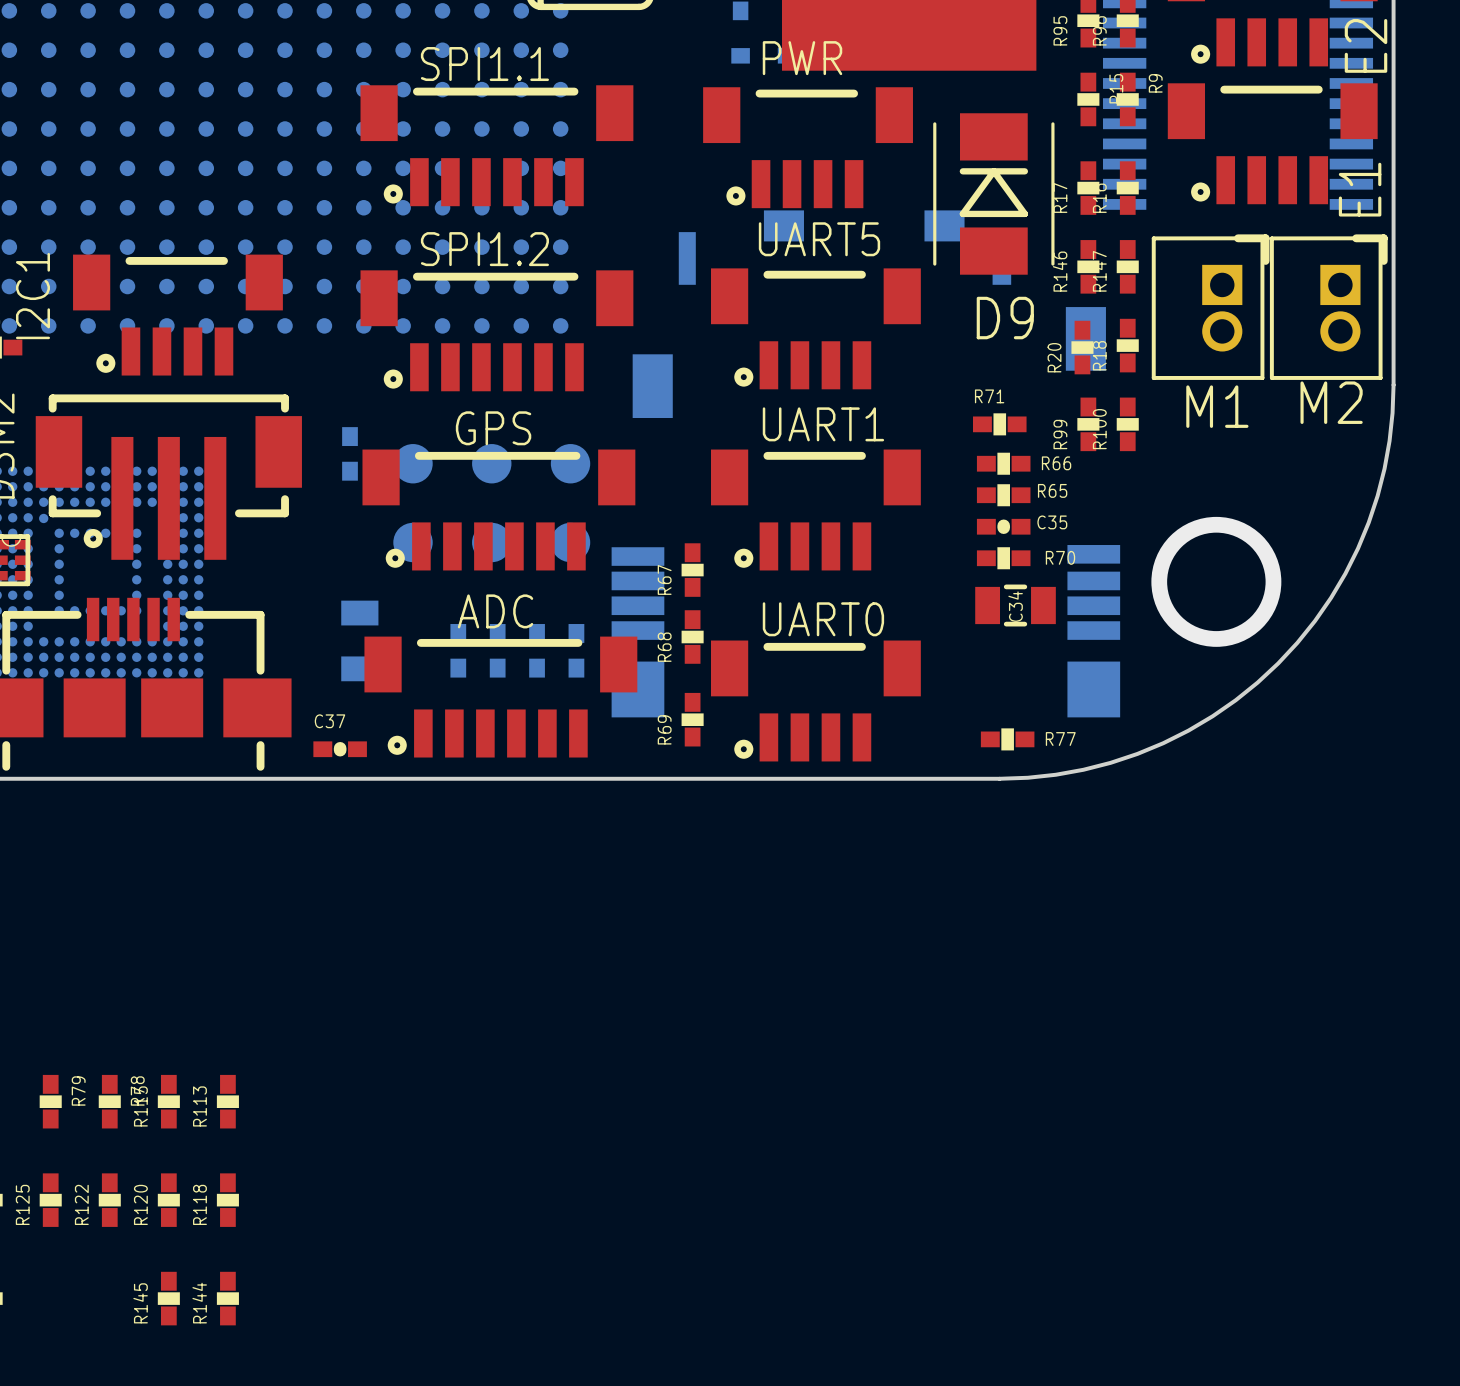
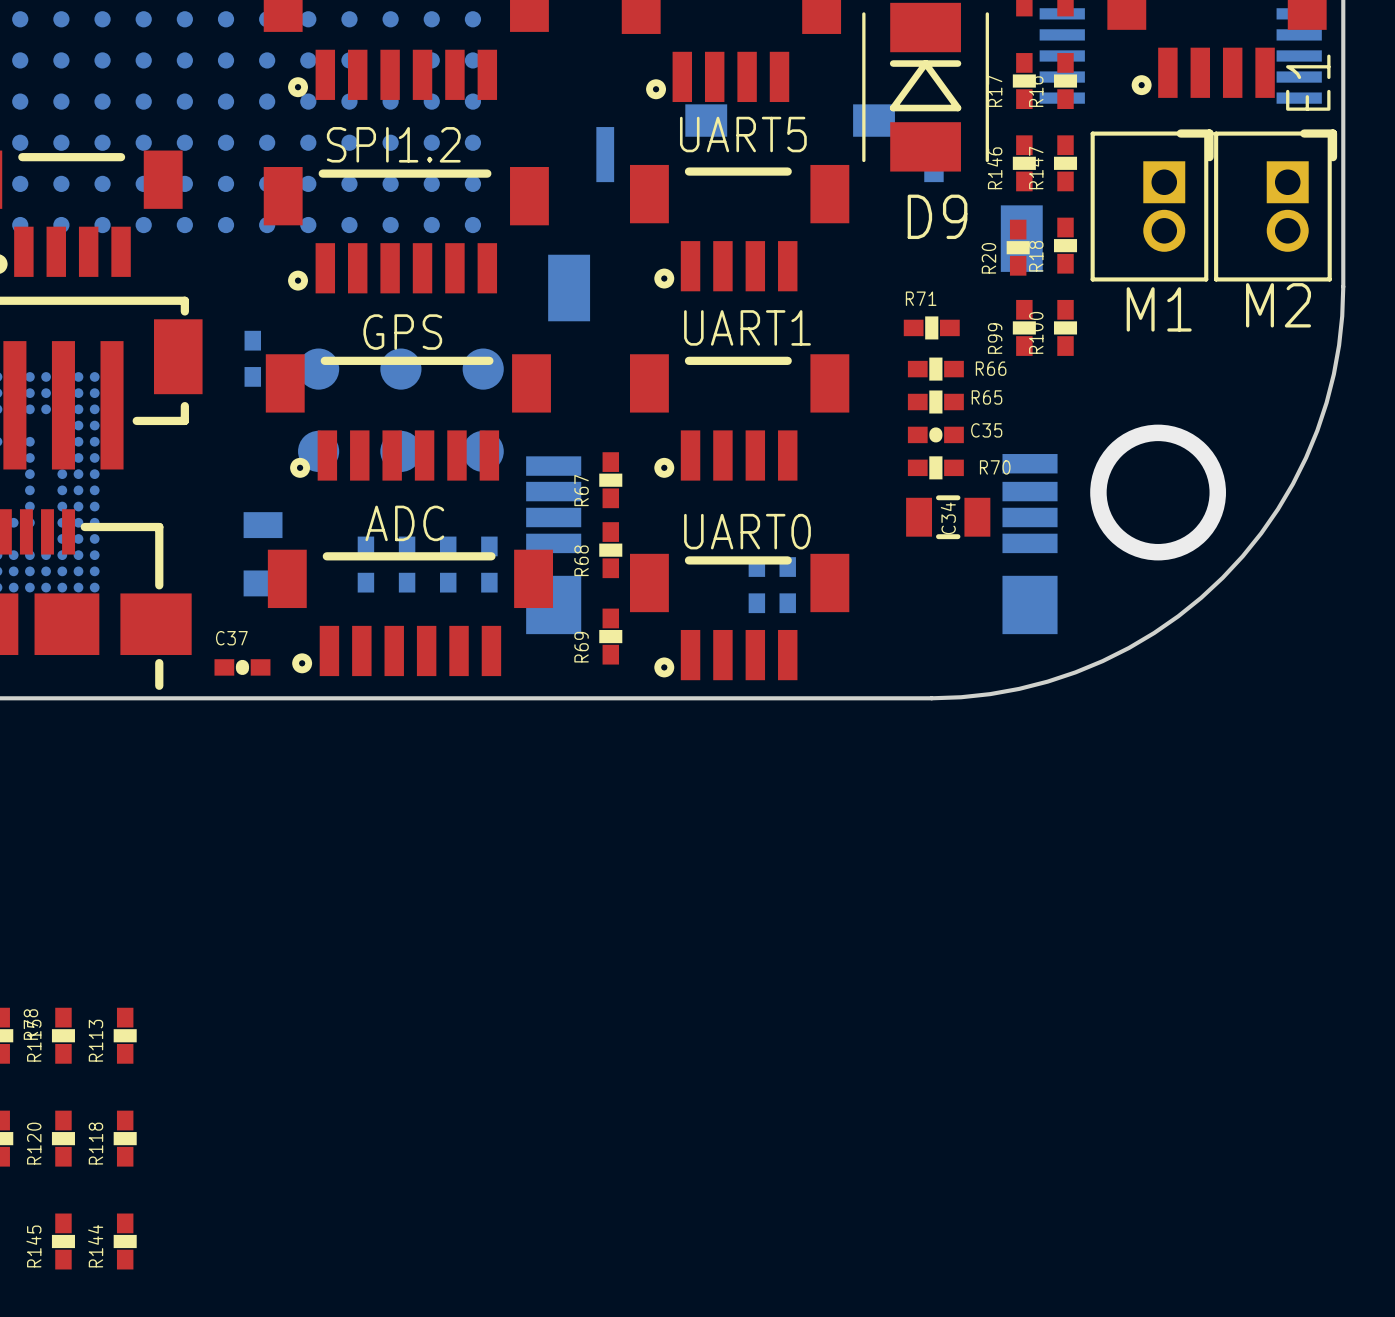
part: none -> (787, 585)
R77 side: top (1007, 739) -> bottom (756, 585)

